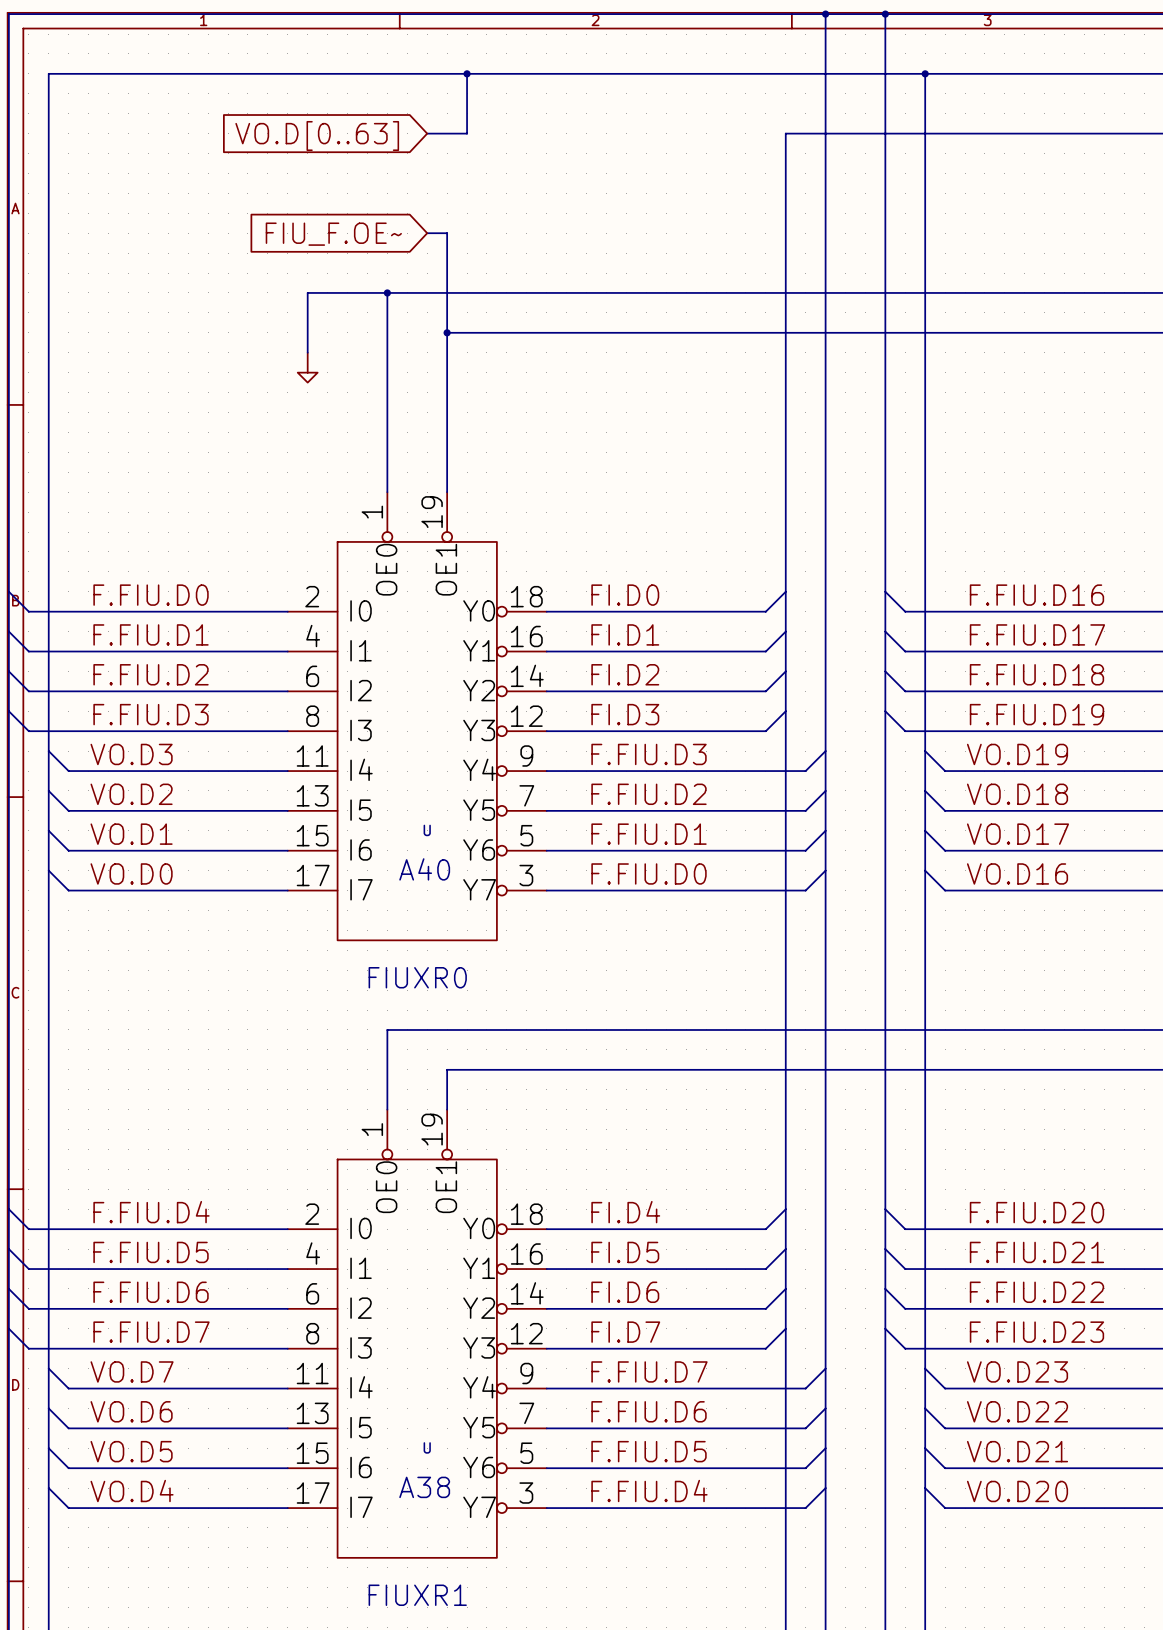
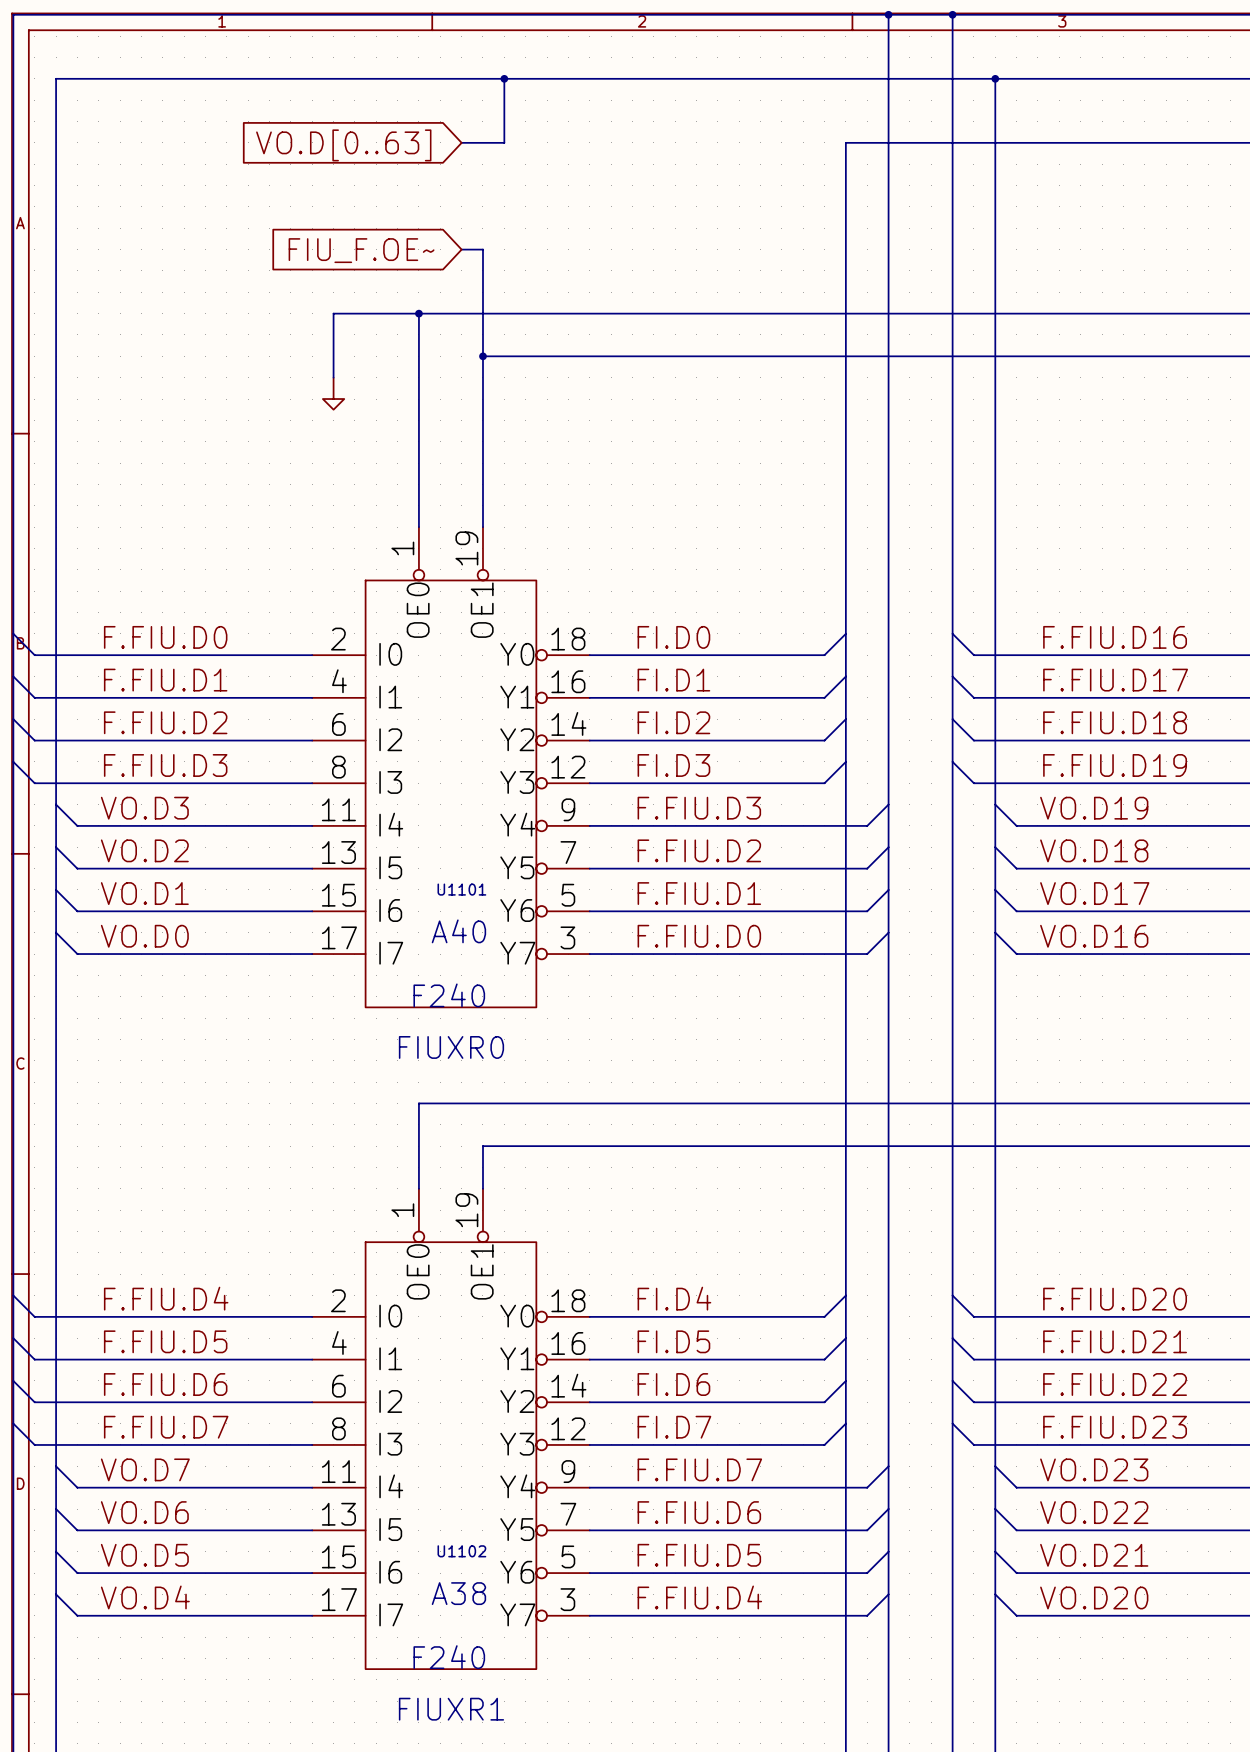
U name: U (427, 830) -> U1101 (461, 889)
U value: none -> F240 (449, 995)
U name: U (427, 1447) -> U1102 (461, 1551)
U value: none -> F240 (449, 1657)

